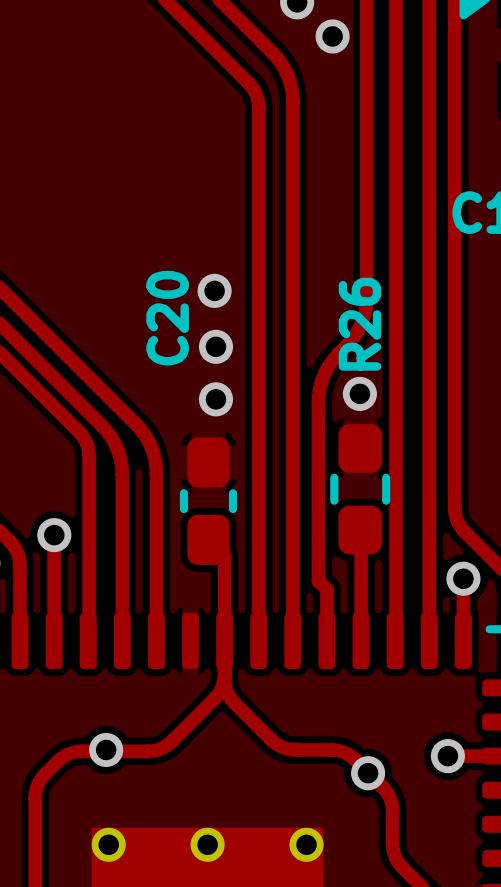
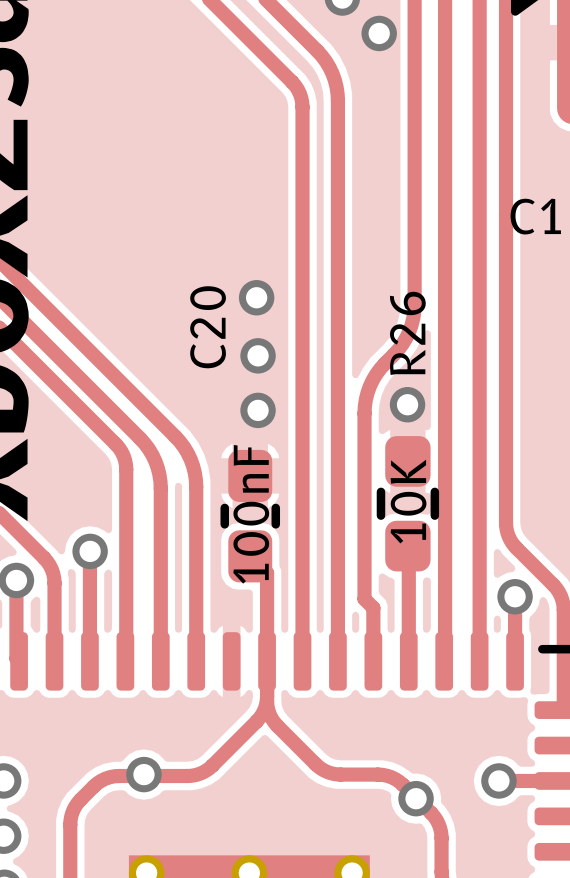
R26 value: none -> 10K (408, 501)
C20 value: none -> 100nF (251, 514)

